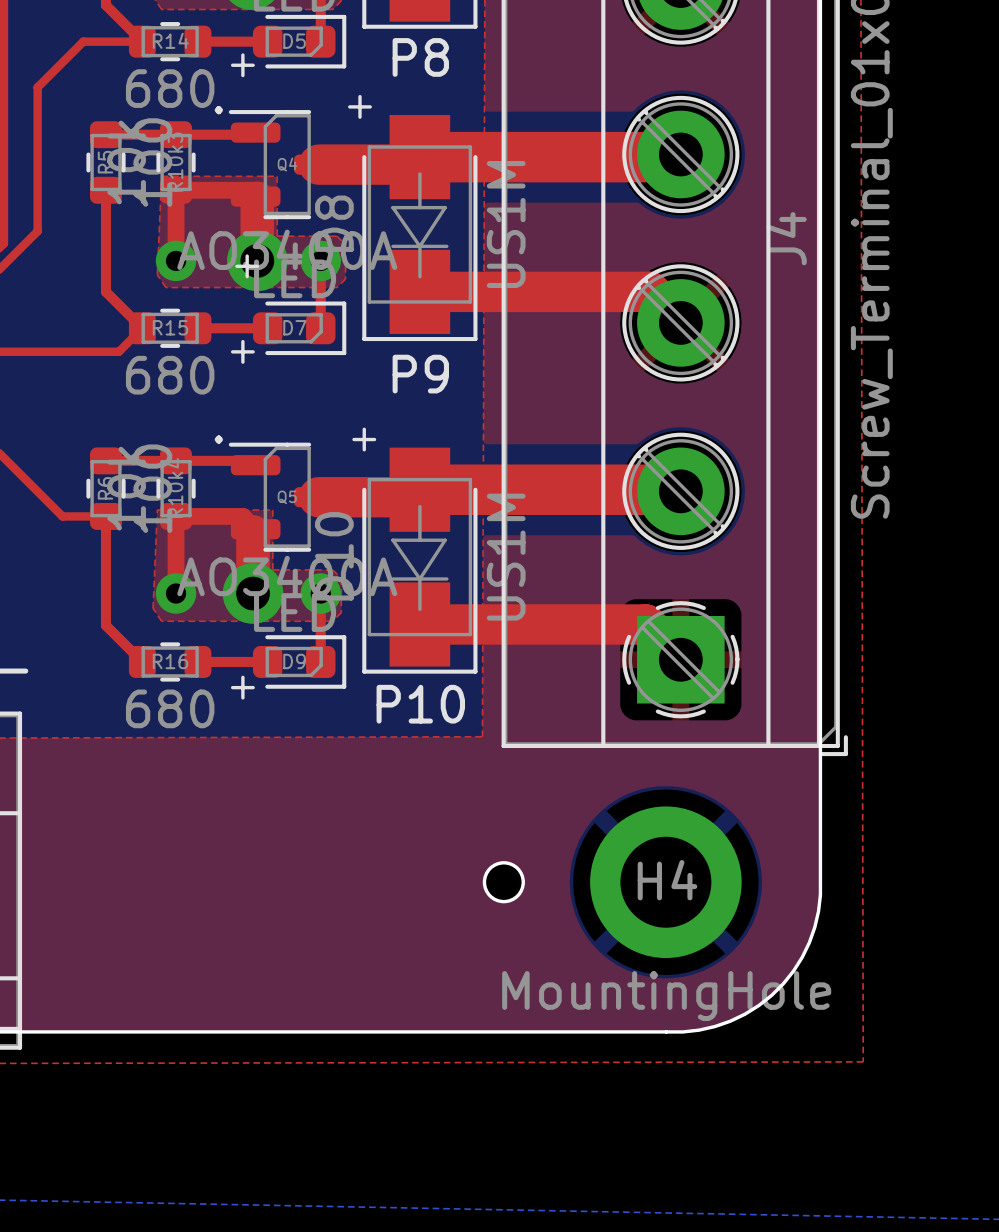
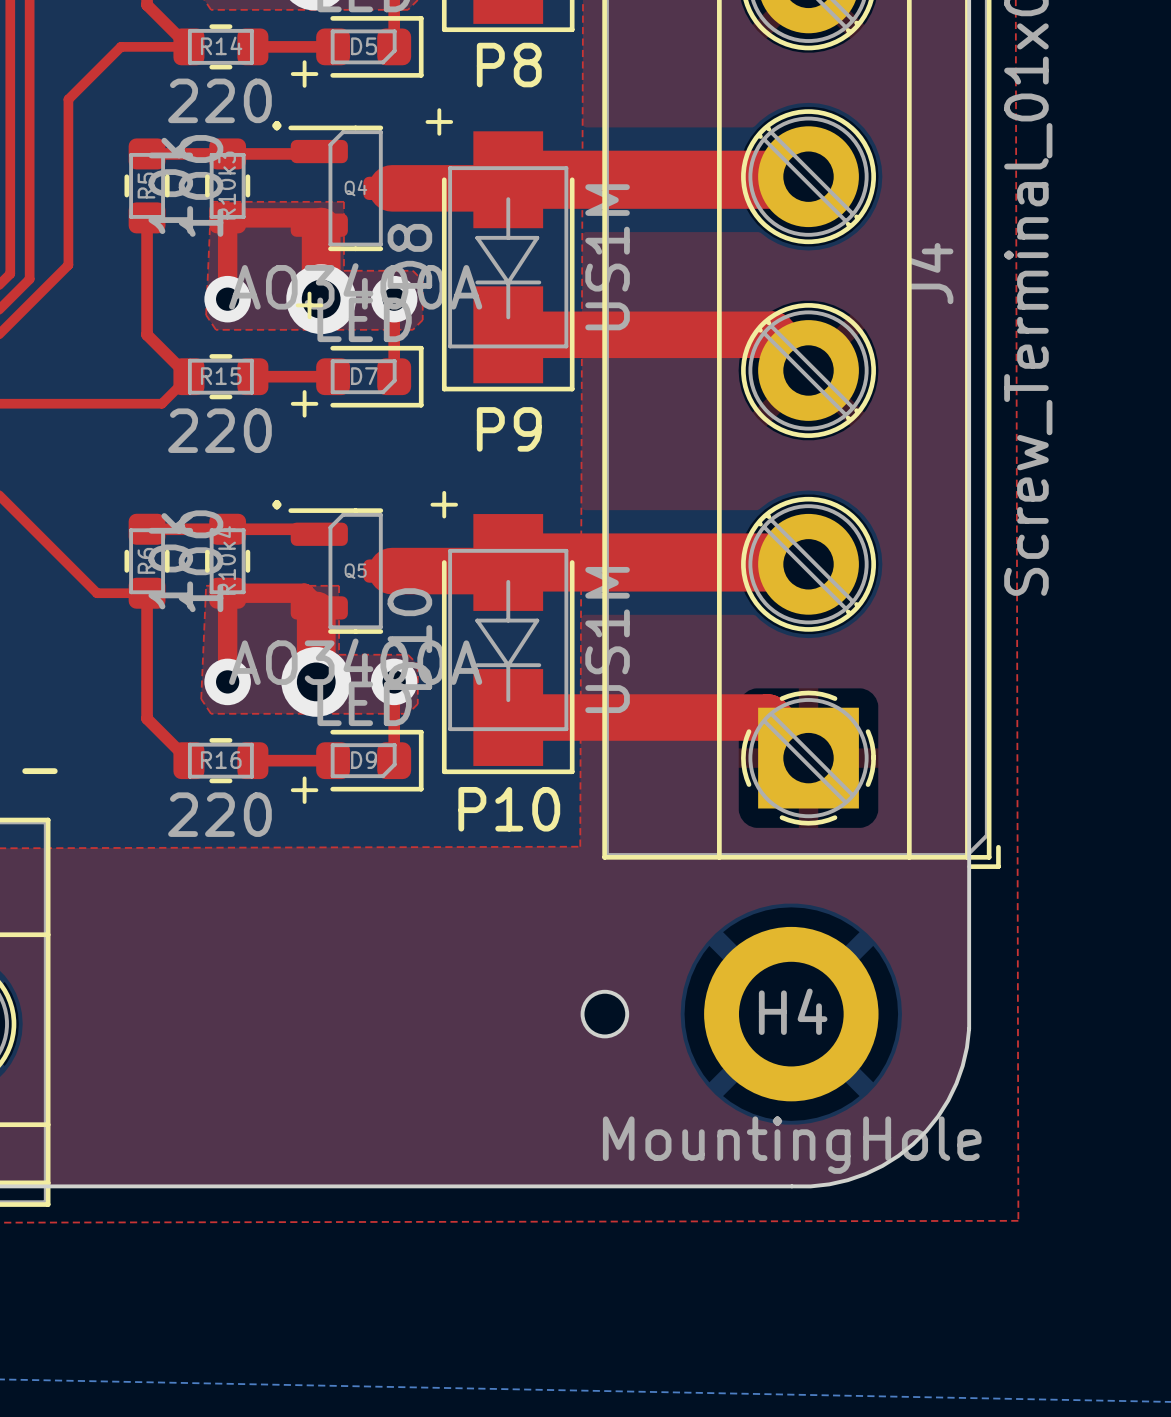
R14 value: 680 (170, 88) -> 220 (219, 100)
R15 value: 680 (170, 375) -> 220 (219, 430)
R16 value: 680 (170, 708) -> 220 (219, 814)

